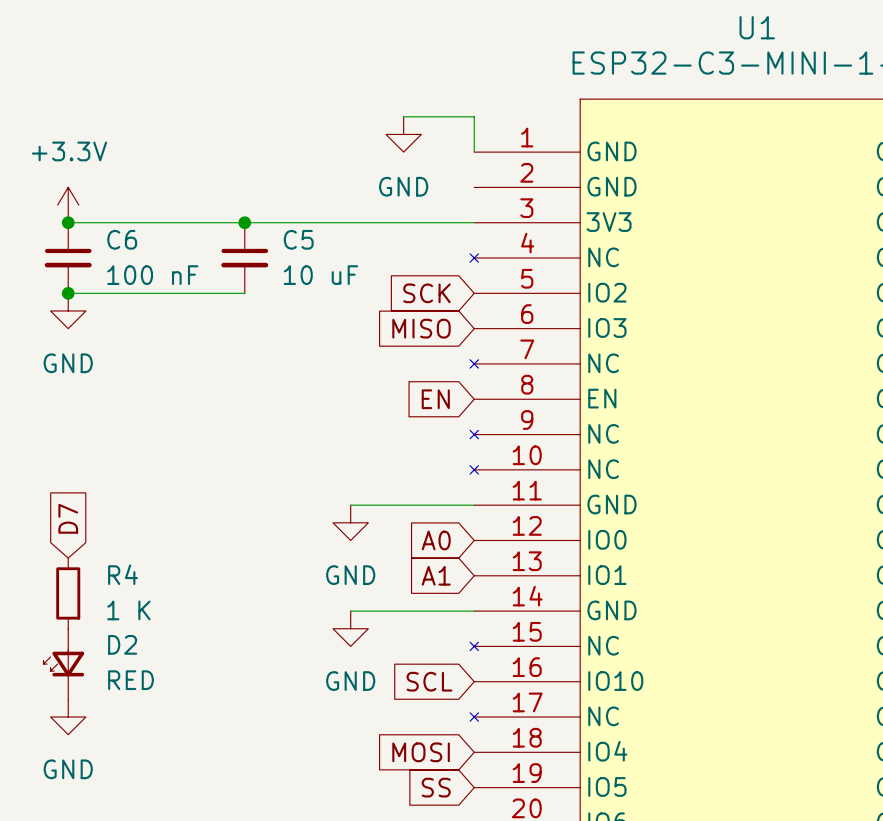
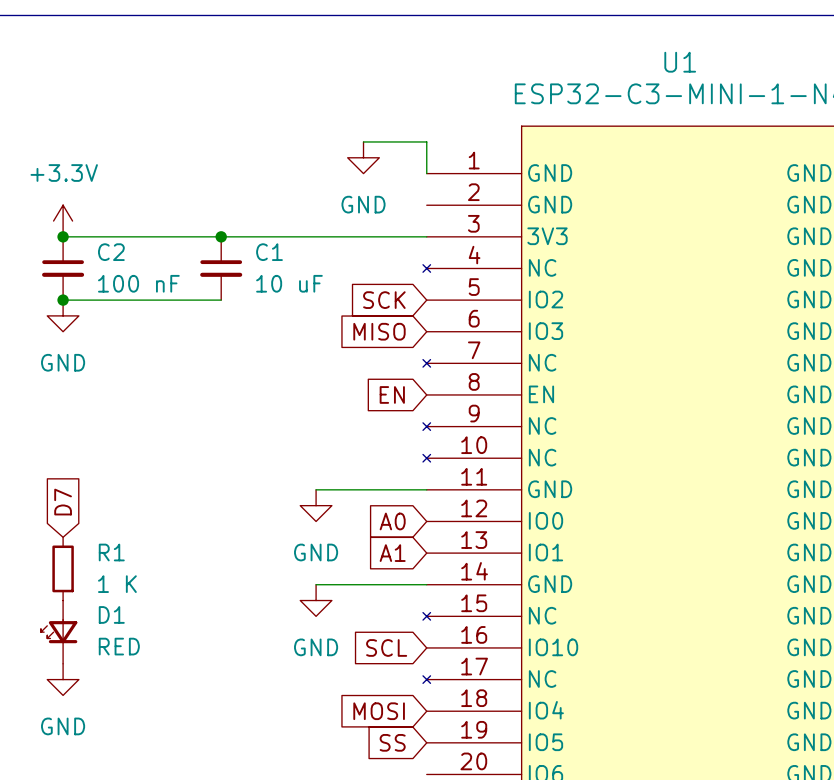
C6 name: C6 (122, 239) -> C2 (111, 252)
C5 name: C5 (298, 239) -> C1 (269, 252)
R4 name: R4 (123, 574) -> R1 (111, 552)
D2 name: D2 (122, 644) -> D1 (111, 614)

